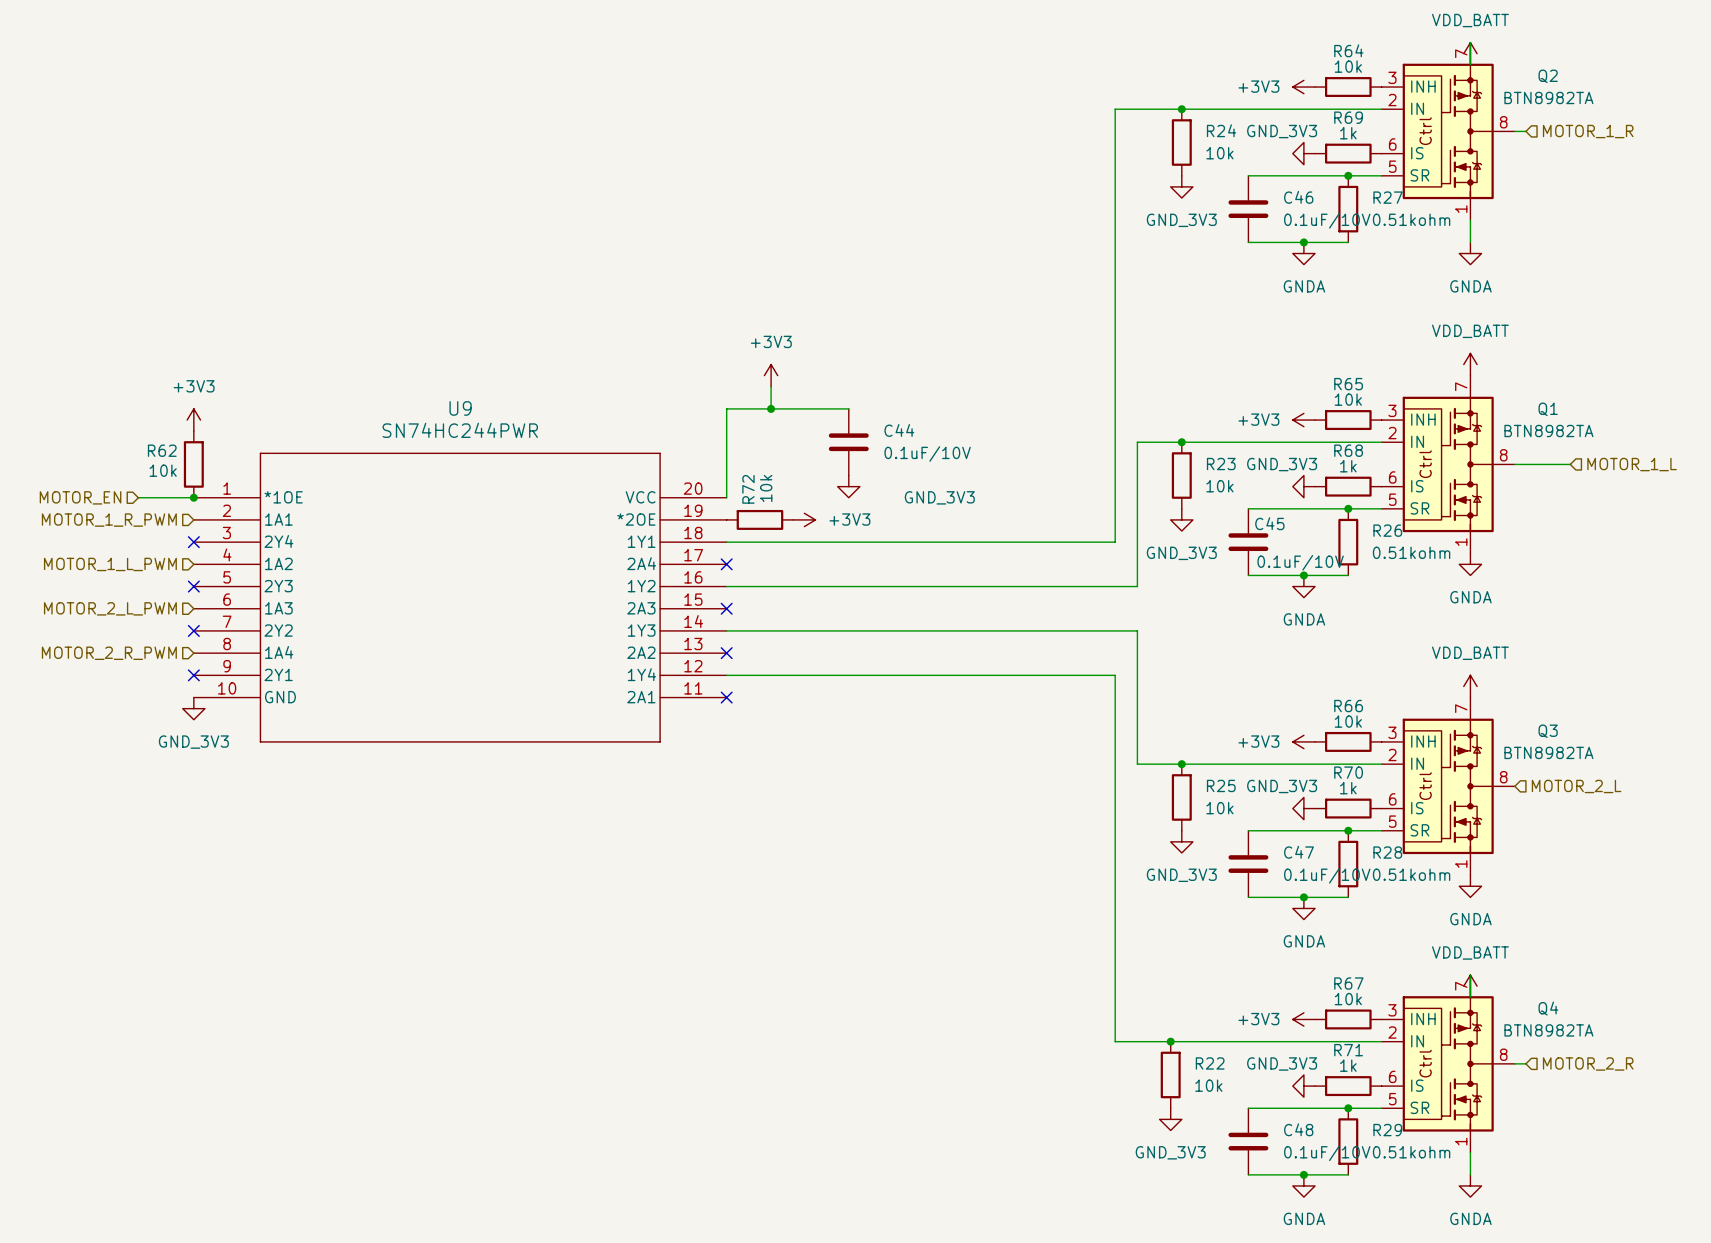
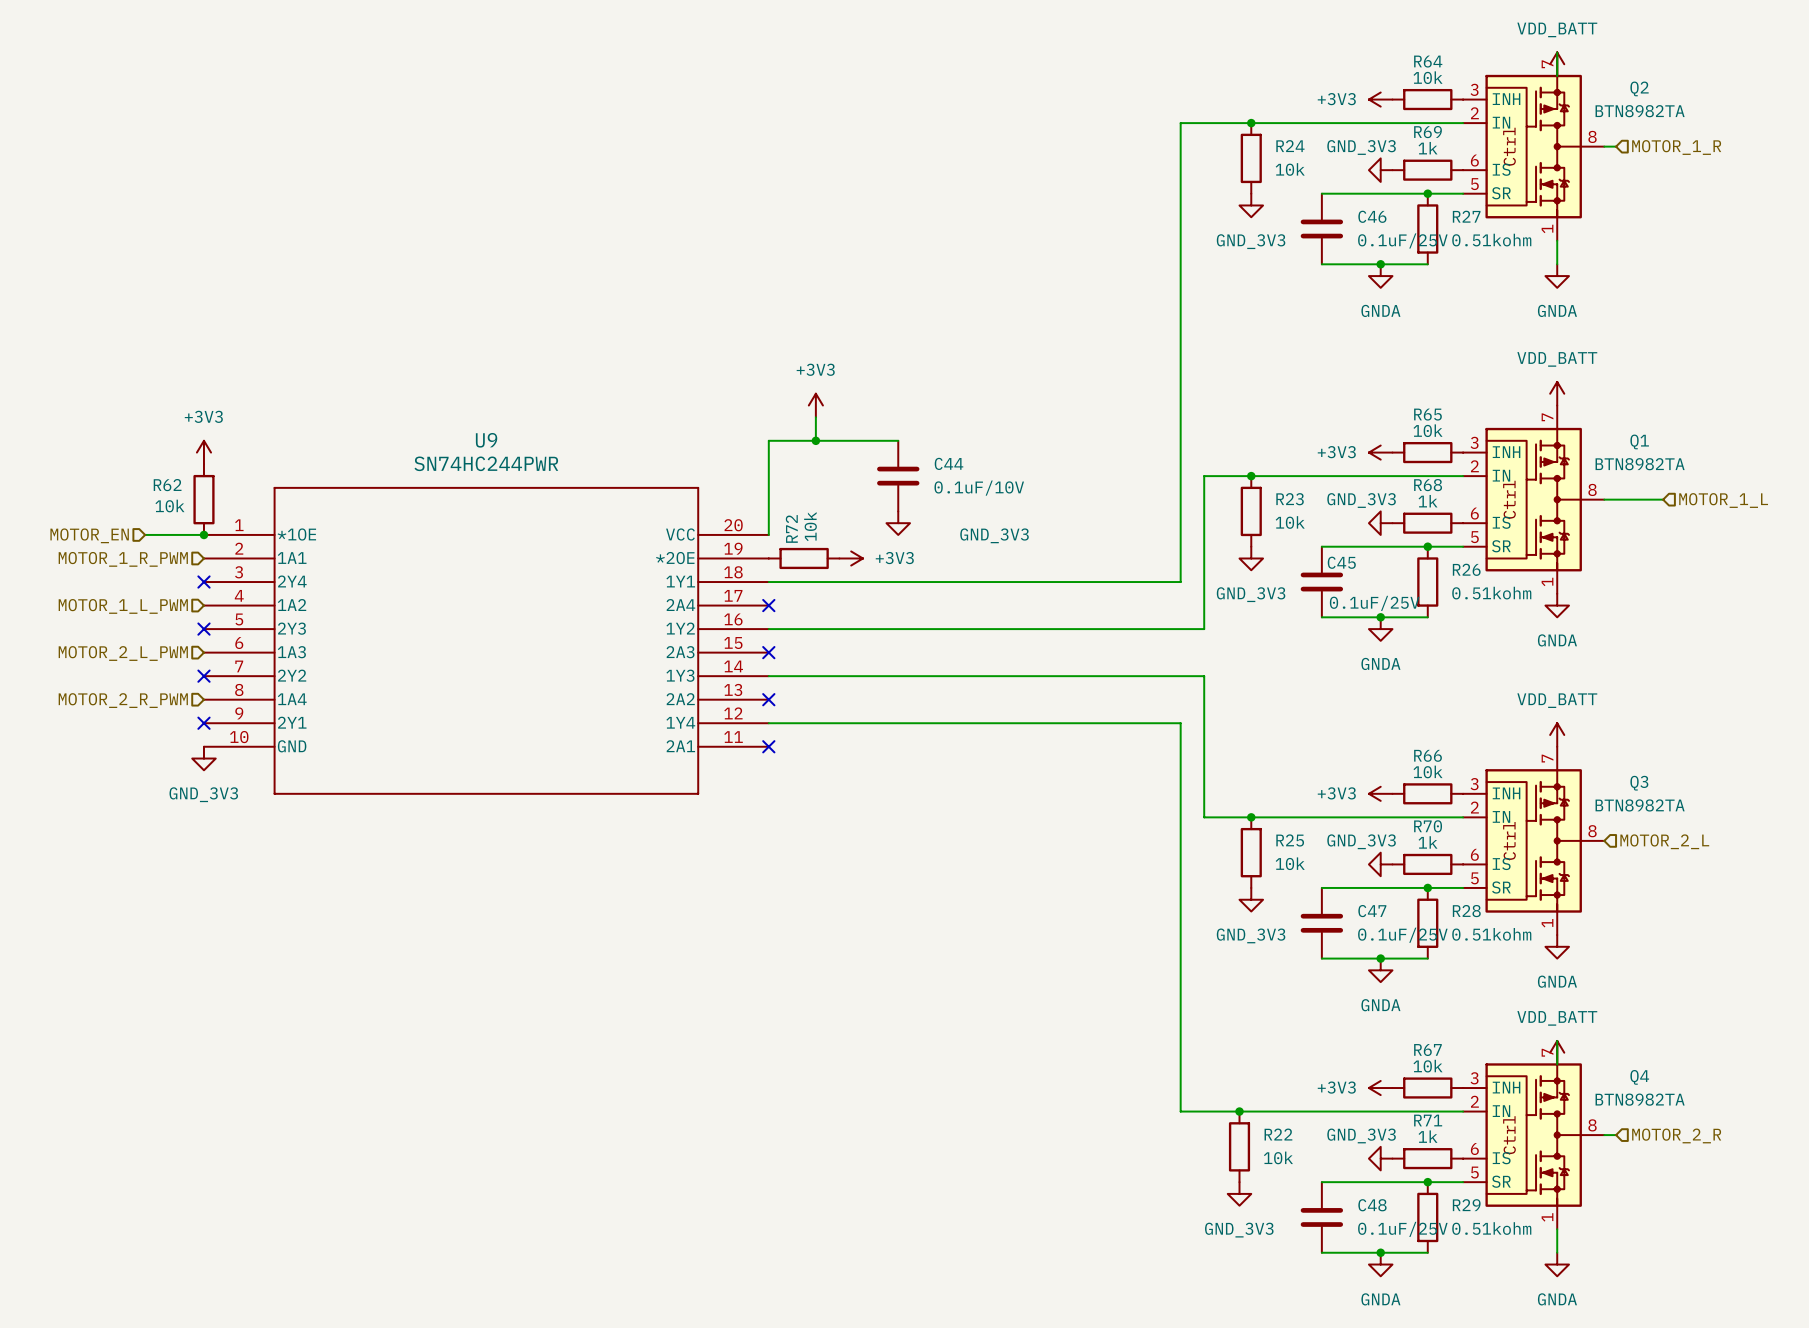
C46 value: 0.1uF/10V (1327, 220) -> 0.1uF/25V (1402, 240)
C45 value: 0.1uF/10V (1300, 562) -> 0.1uF/25V (1374, 603)
C47 value: 0.1uF/10V (1327, 875) -> 0.1uF/25V (1402, 935)
C48 value: 0.1uF/10V (1327, 1153) -> 0.1uF/25V (1402, 1229)

